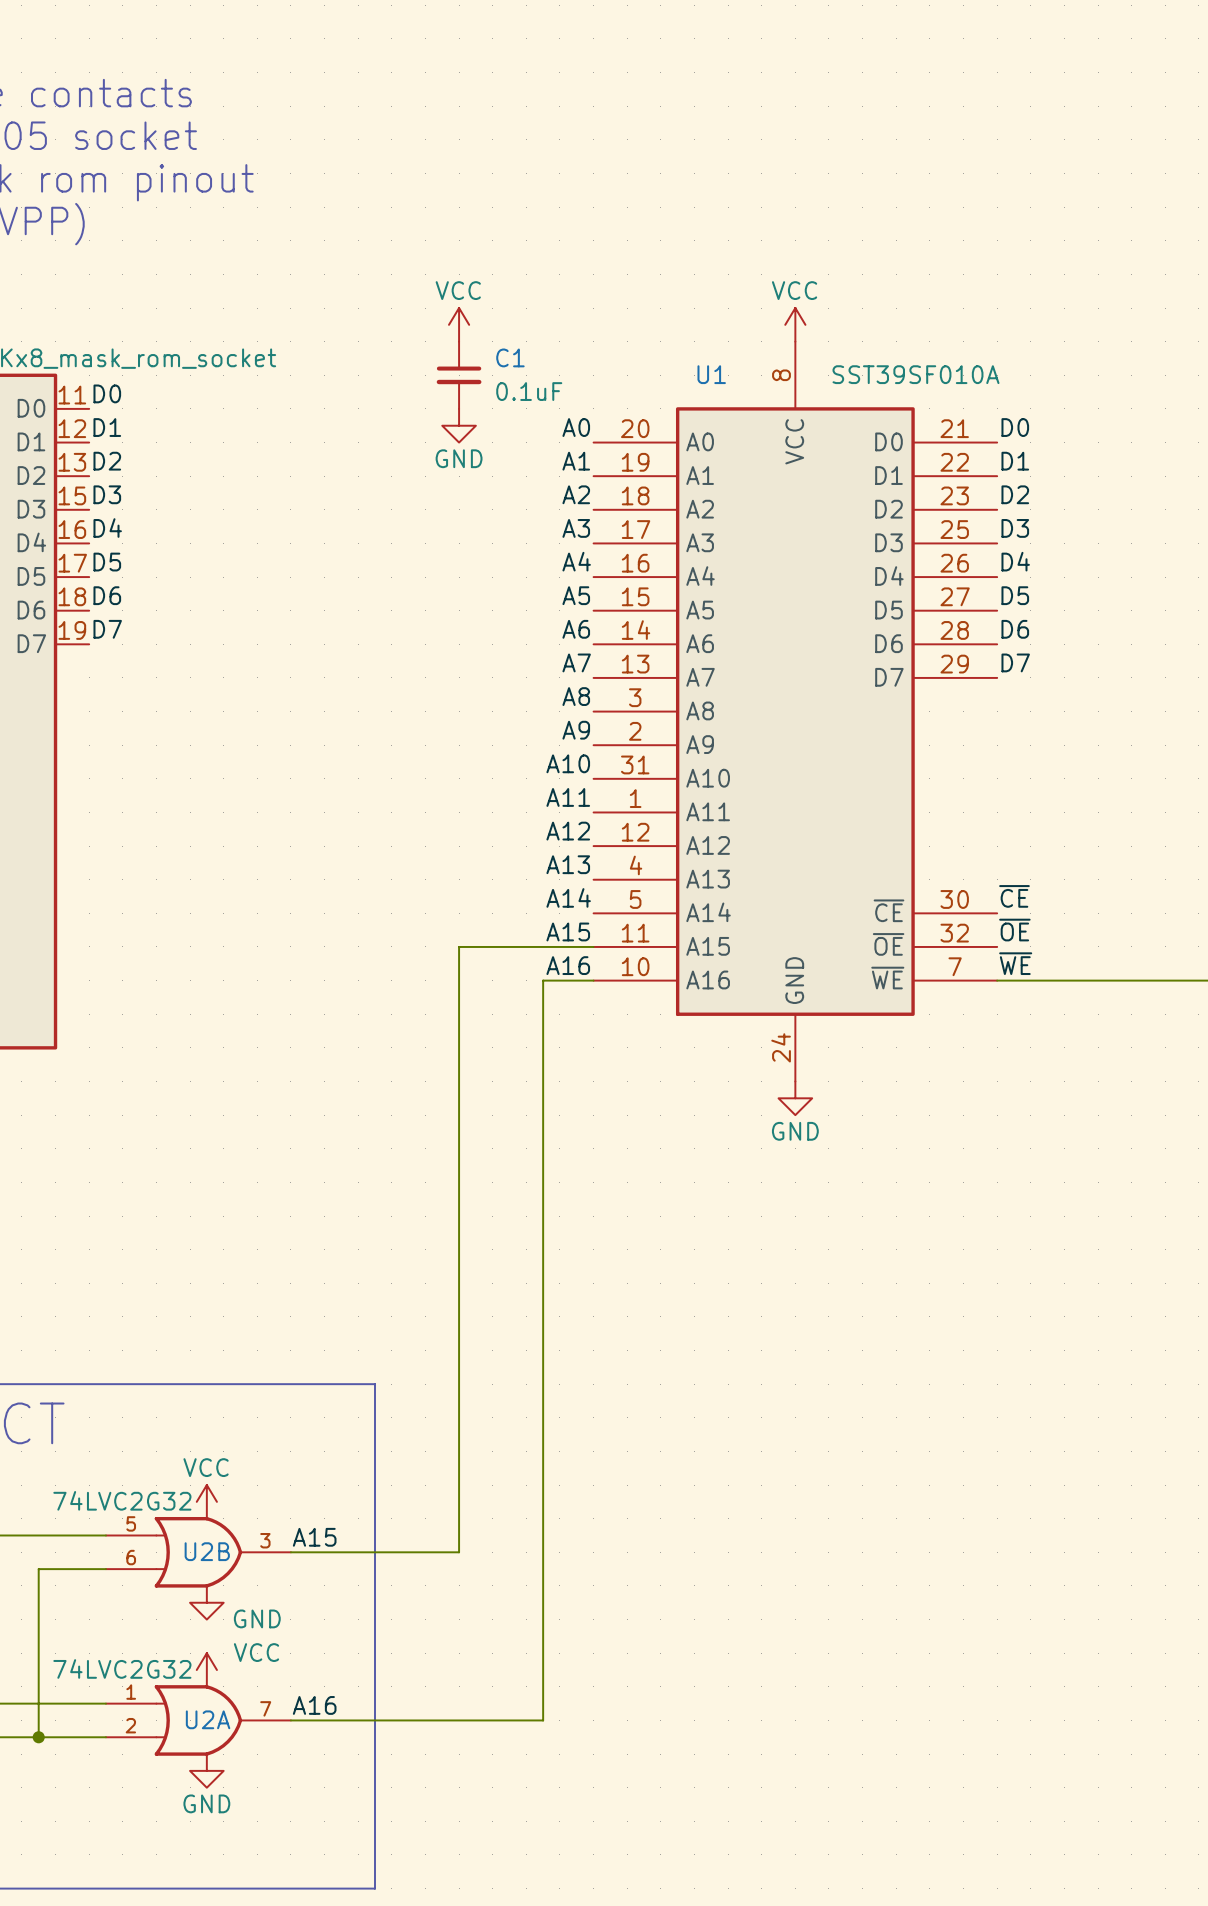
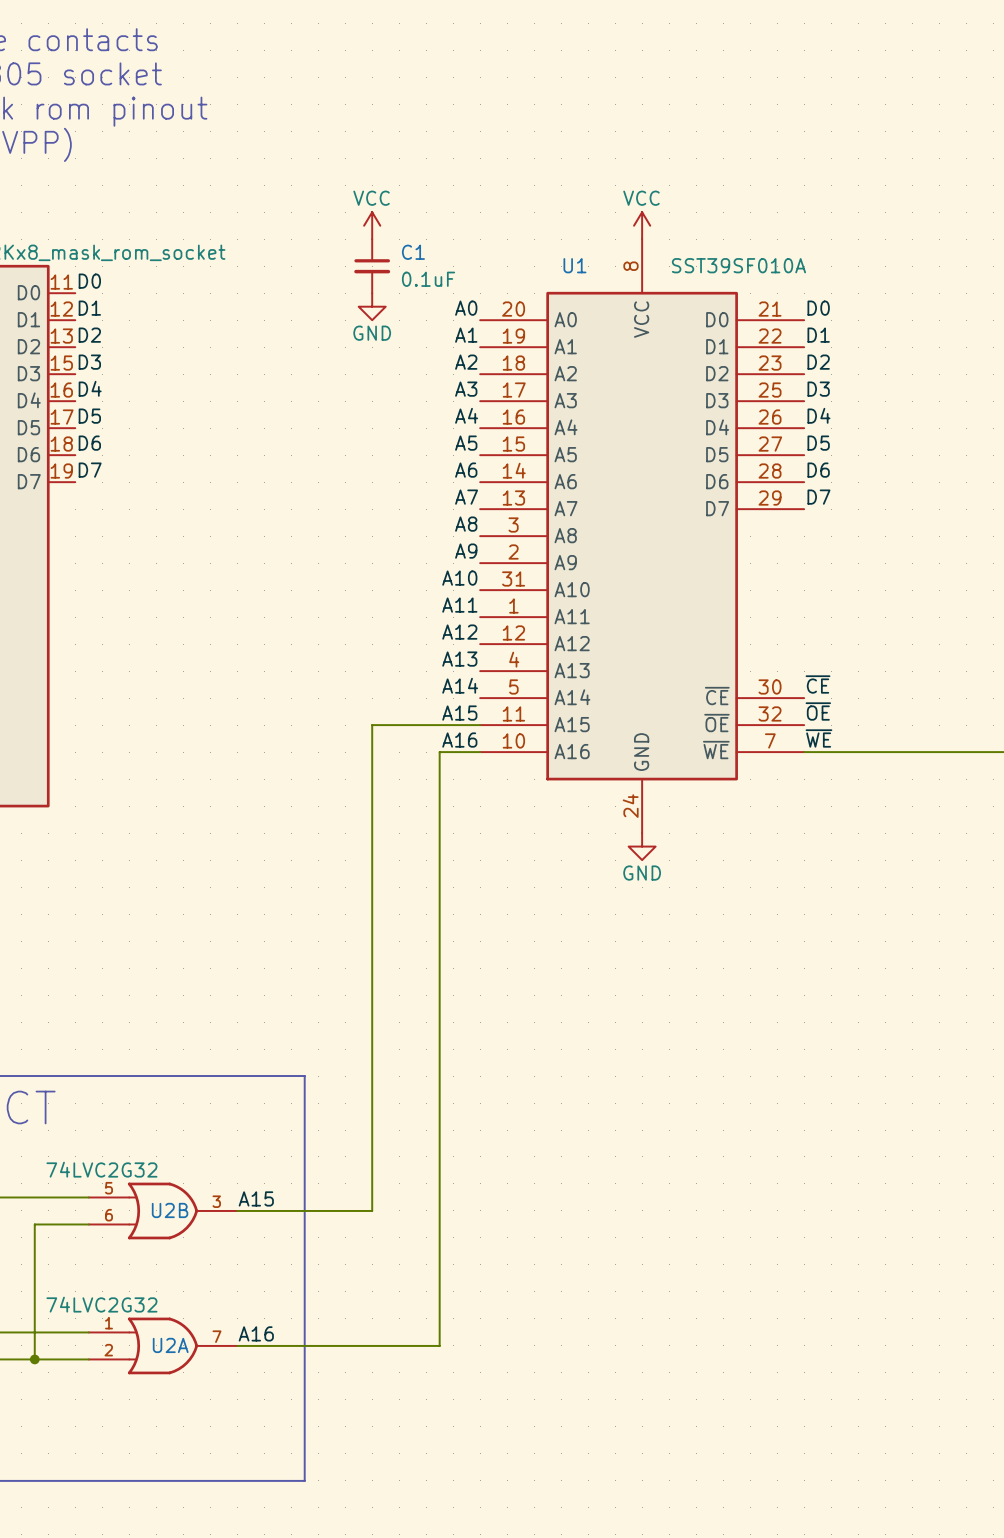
power symbol: VCC (206, 1501) -> none
power symbol: GND (206, 1602) -> none
power symbol: VCC (206, 1670) -> none
power symbol: GND (206, 1770) -> none

